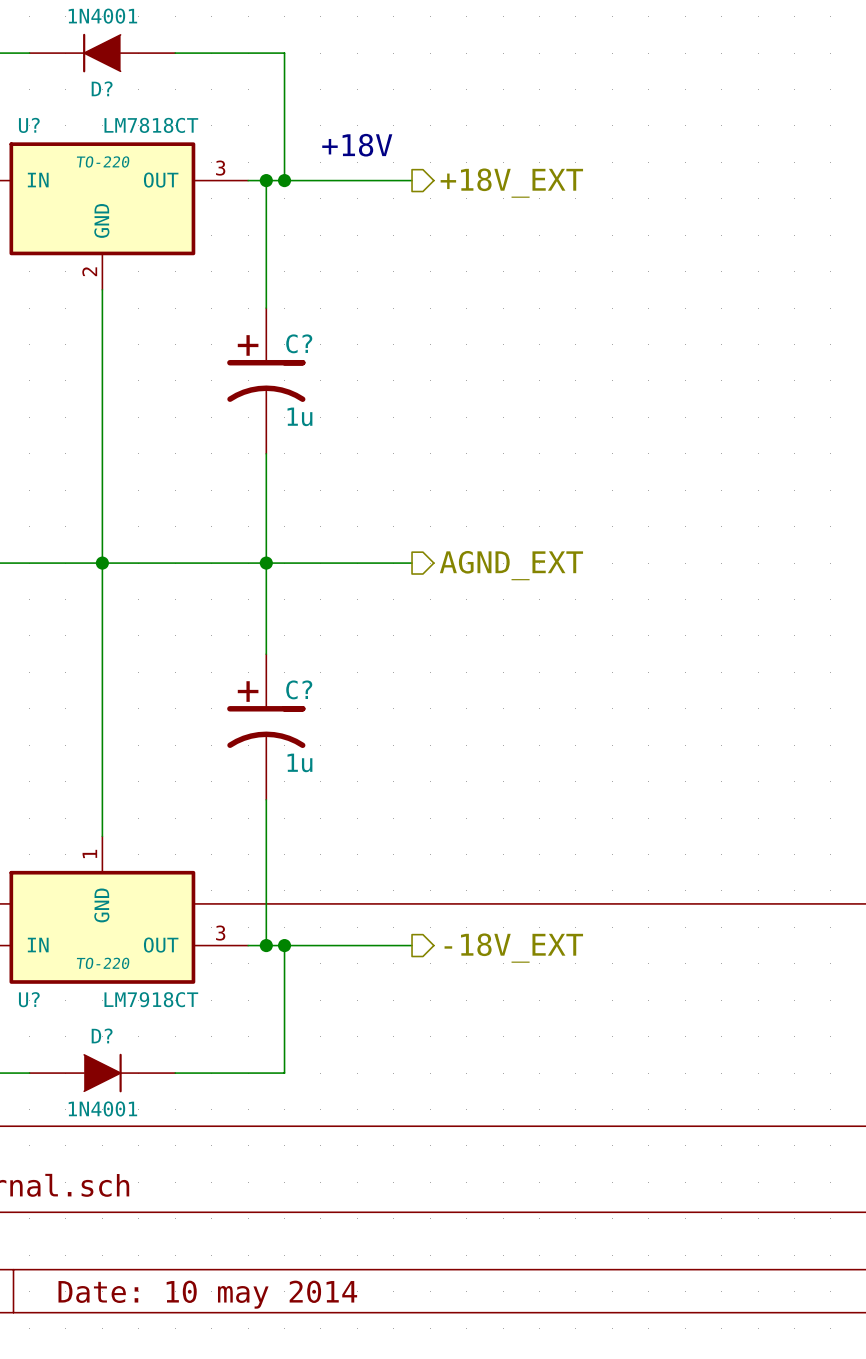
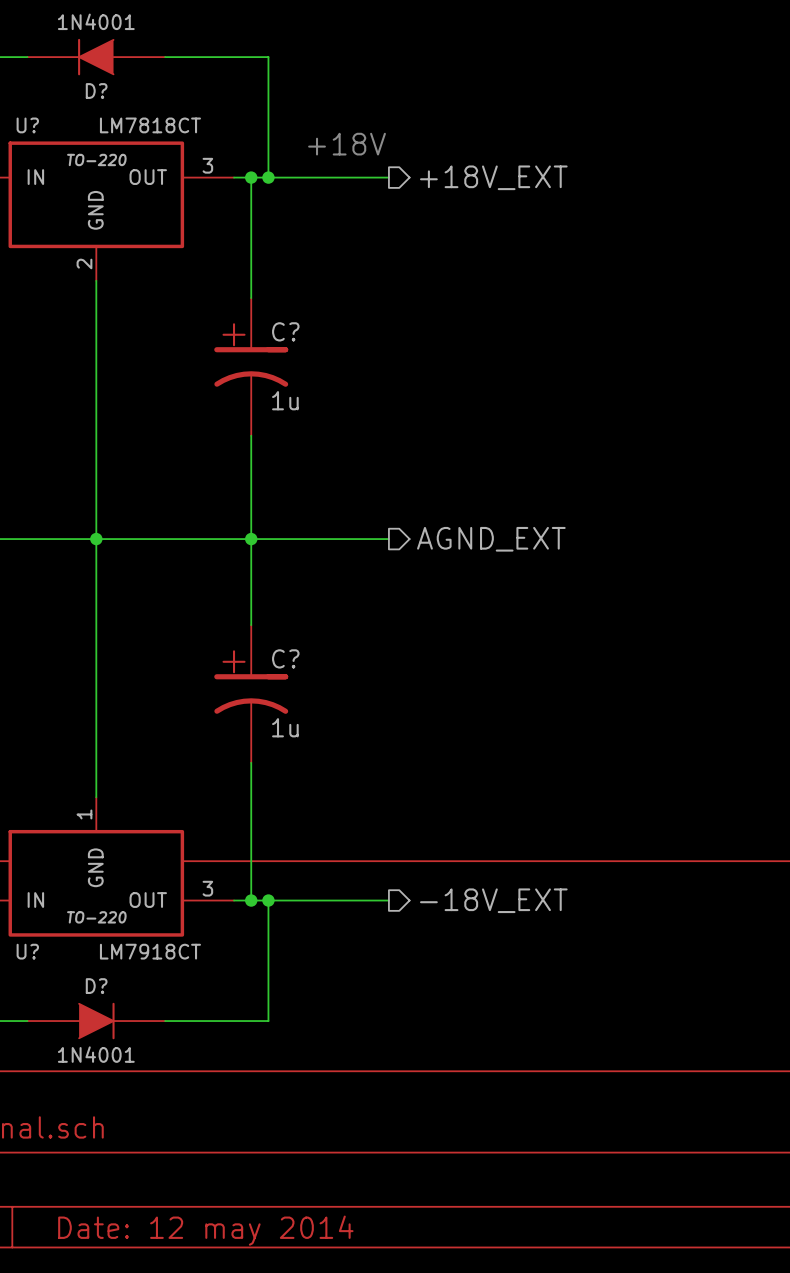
title block: Date: 10 may 2014 (207, 1294) -> Date: 12 may 2014 (205, 1230)

